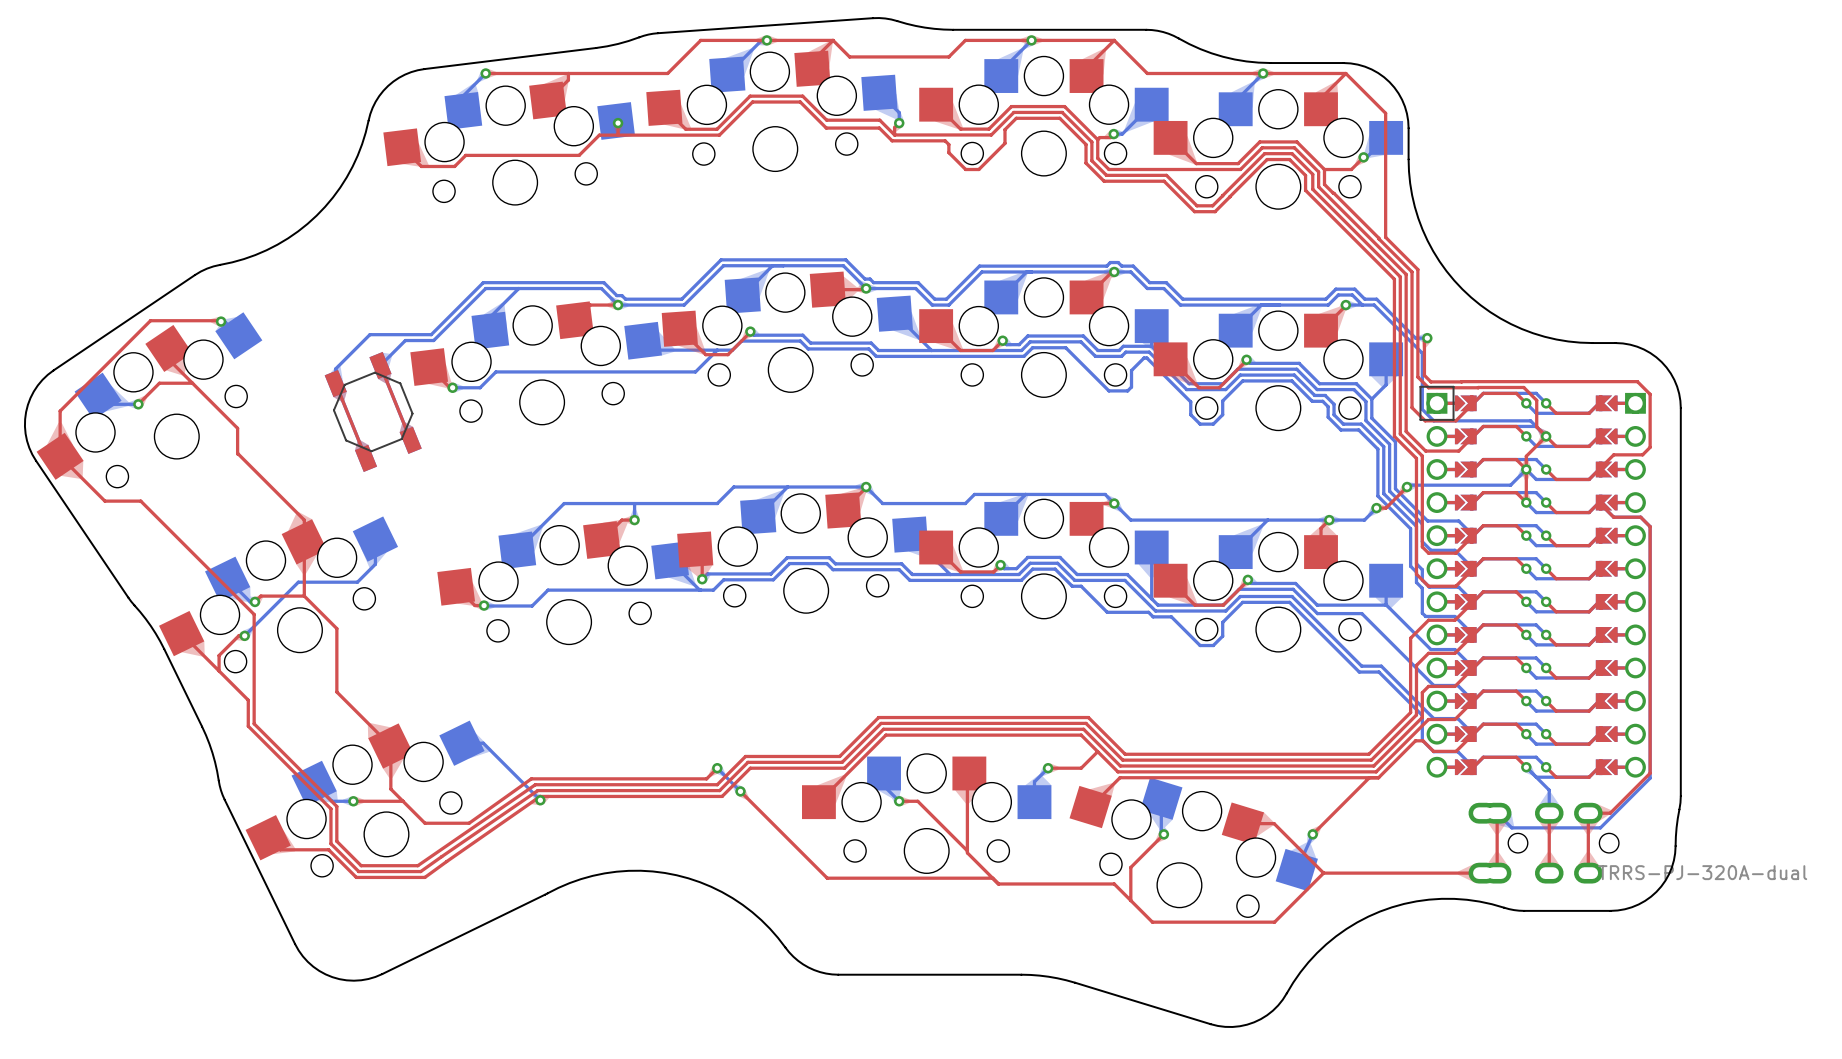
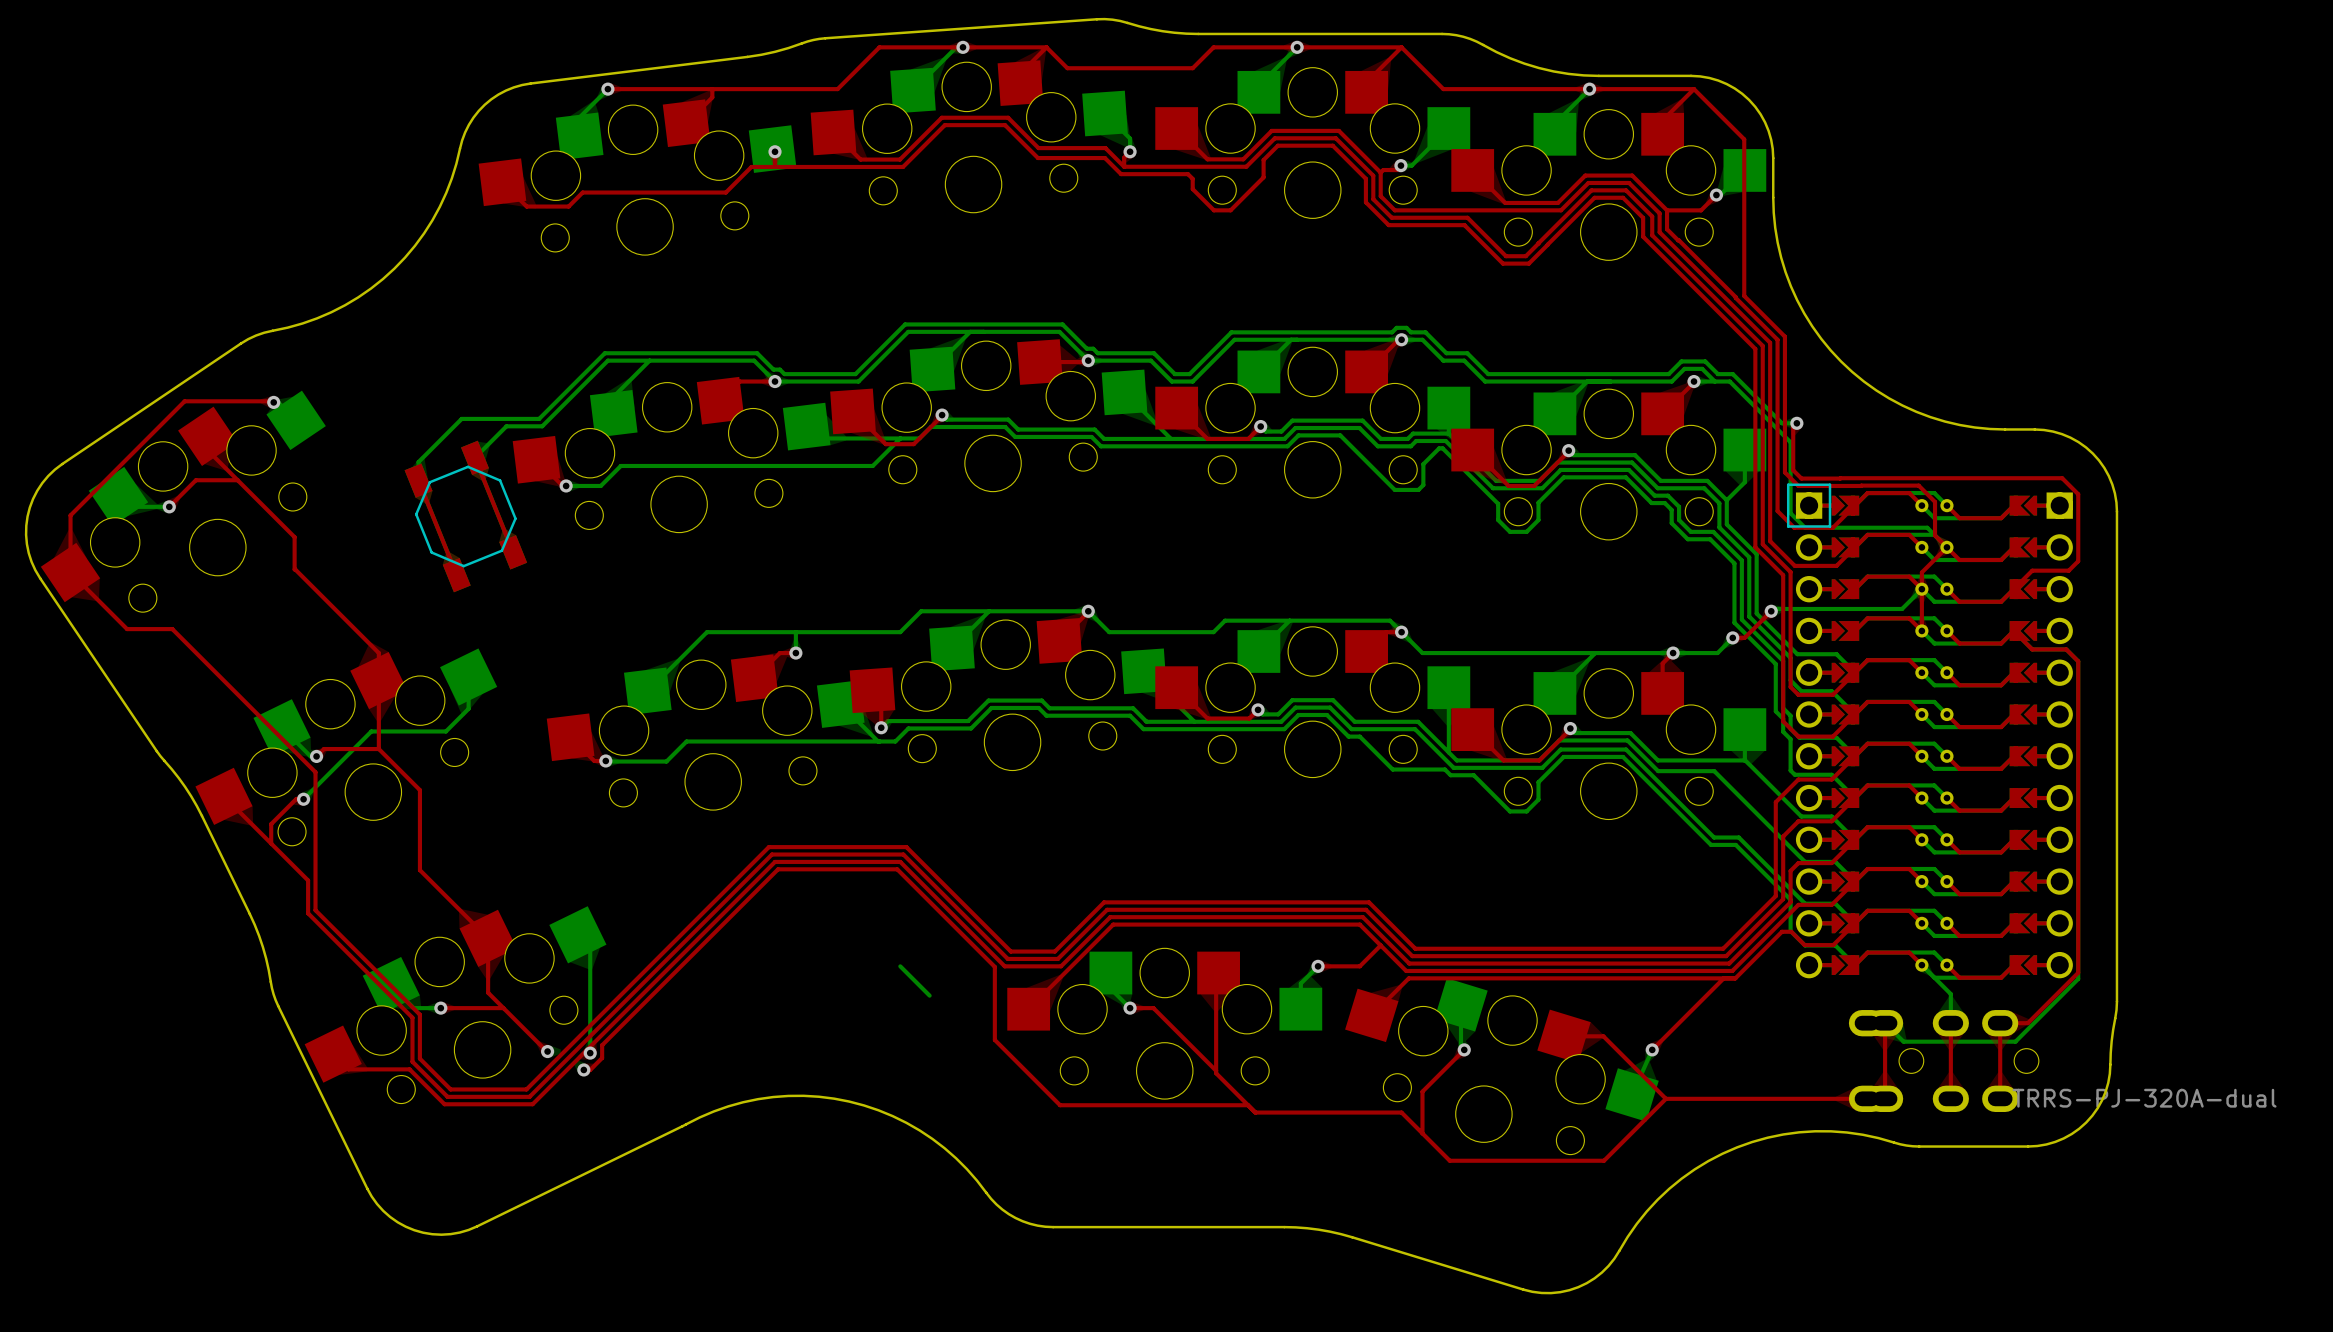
bottom track: (461, 743) (483, 743) (540, 800) -> none
bottom track: none -> (590, 947) (590, 1053)
top track: (804, 756) (745, 756) (717, 784) (535, 784) (417, 865) -> (1010, 951) (906, 847) (768, 847) (526, 1089) (522, 1089)
top track: (802, 762) (747, 762) (719, 790) (537, 790) (420, 871) -> (1007, 958) (903, 854) (771, 854) (529, 1096) (525, 1096)
top track: (717, 768) (706, 778) (531, 778) (469, 823) (424, 823) -> (547, 1051) (531, 1035)
via: (717, 768) -> none
top track: (800, 768) (750, 768) (722, 796) (540, 796) (424, 877) -> (1004, 966) (900, 861) (775, 861) (531, 1104)
top track: (740, 791) (827, 878) (843, 878) -> (583, 1069) (590, 1069) (602, 1058) (602, 1045) (778, 869) (897, 869) (994, 966) (994, 1039) (1060, 1105)
via: (740, 791) -> none
via: (540, 800) -> none
via: none -> (547, 1051)
via: none -> (590, 1053)
via: none -> (583, 1069)

